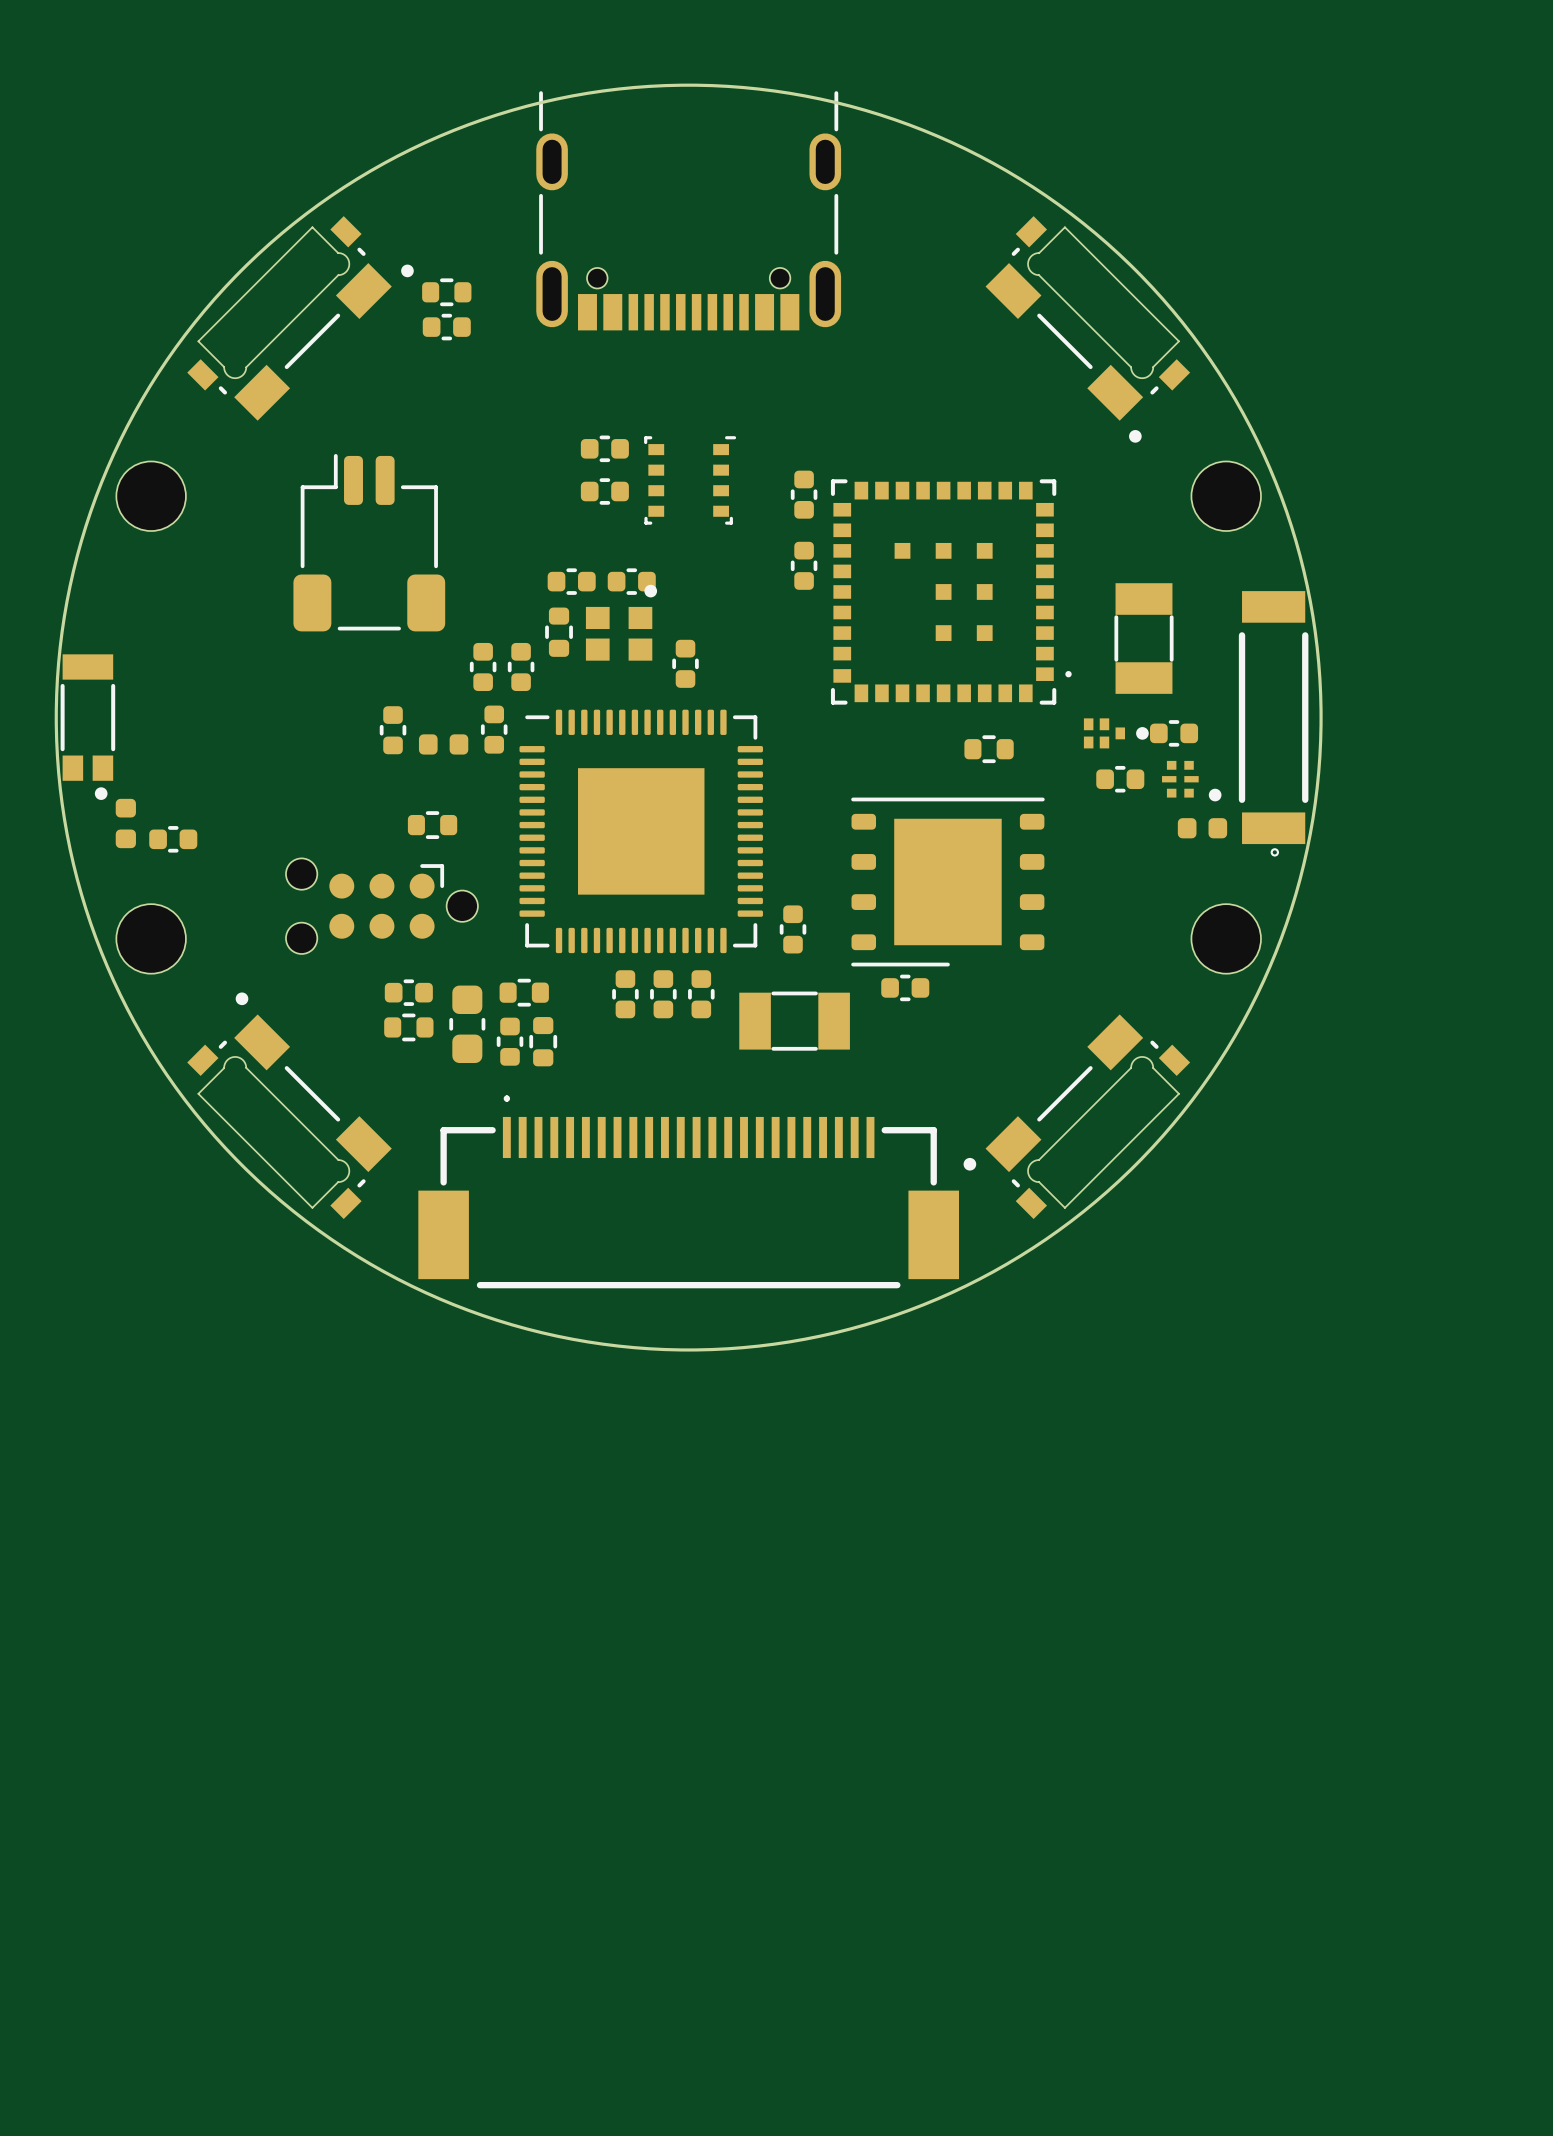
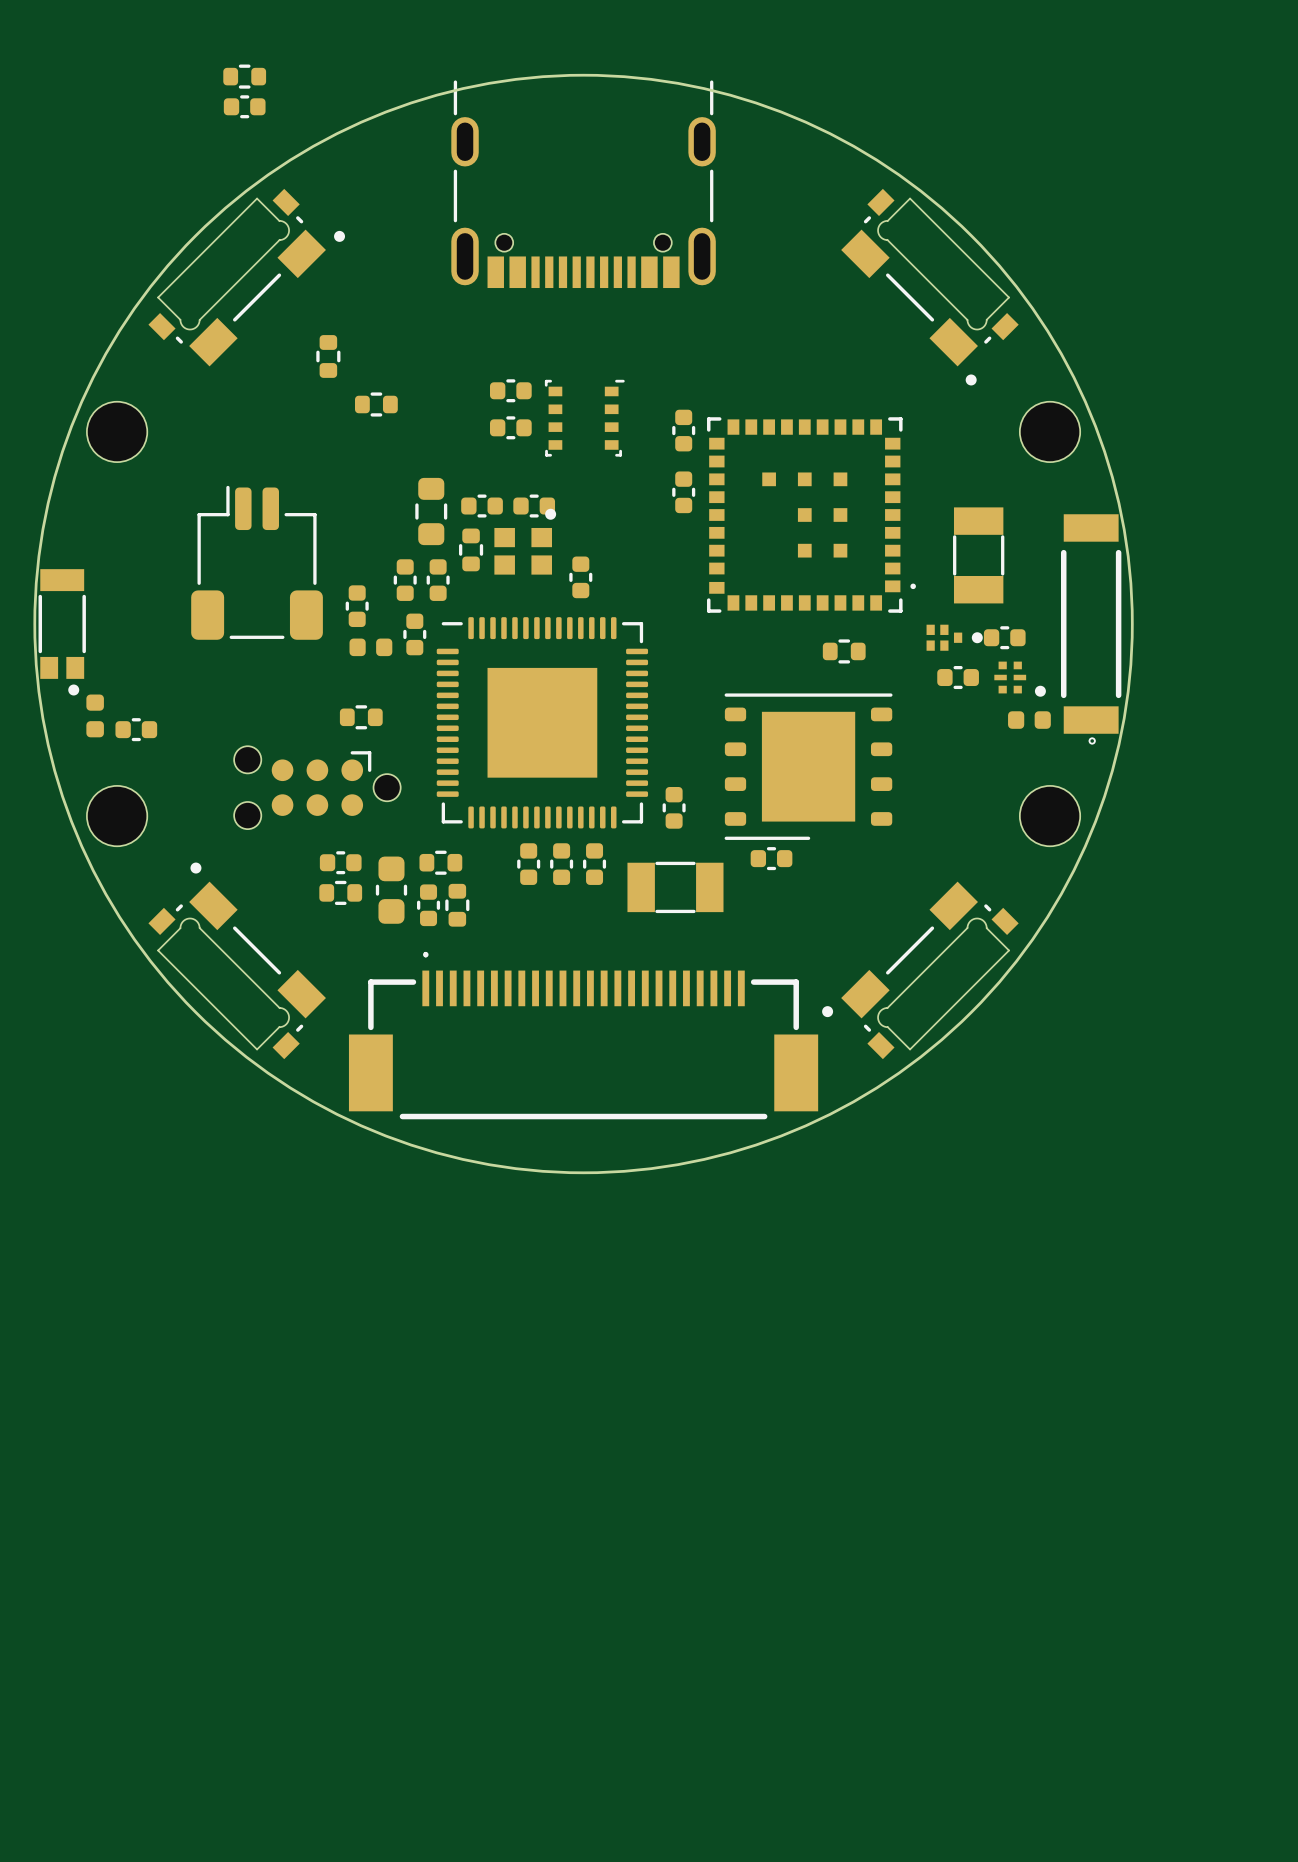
part: none -> (244, 76)
part: none -> (244, 106)
part: (446, 292) -> none
part: (446, 327) -> none
part: none -> (328, 356)
part: none -> (376, 404)
part position: (369, 542) -> (257, 562)
part: none -> (431, 511)
part position: (393, 730) -> (357, 606)

